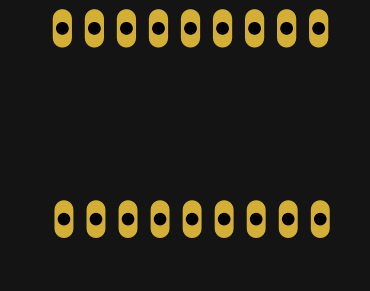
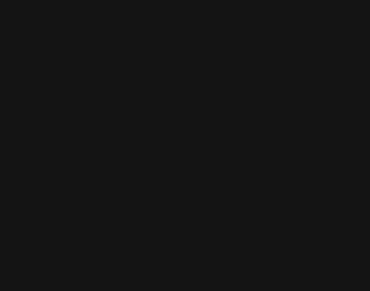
part: (190, 28) -> none
part: (192, 219) -> none

